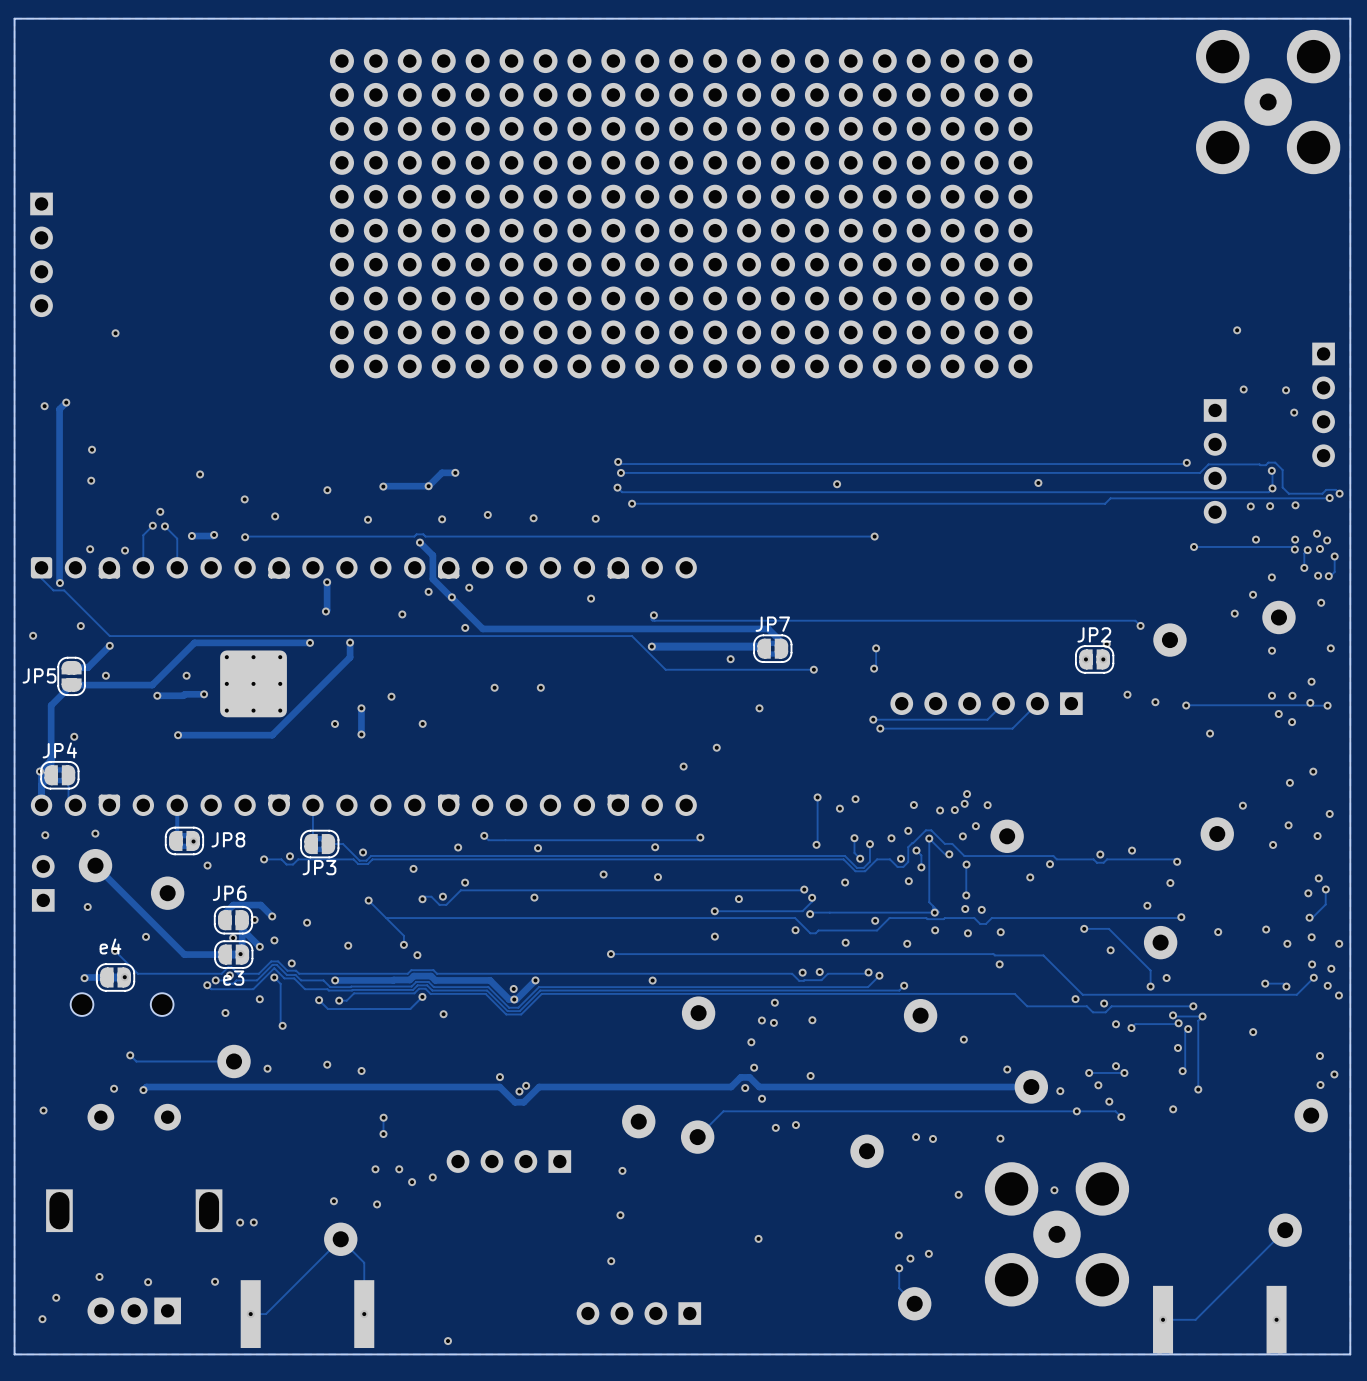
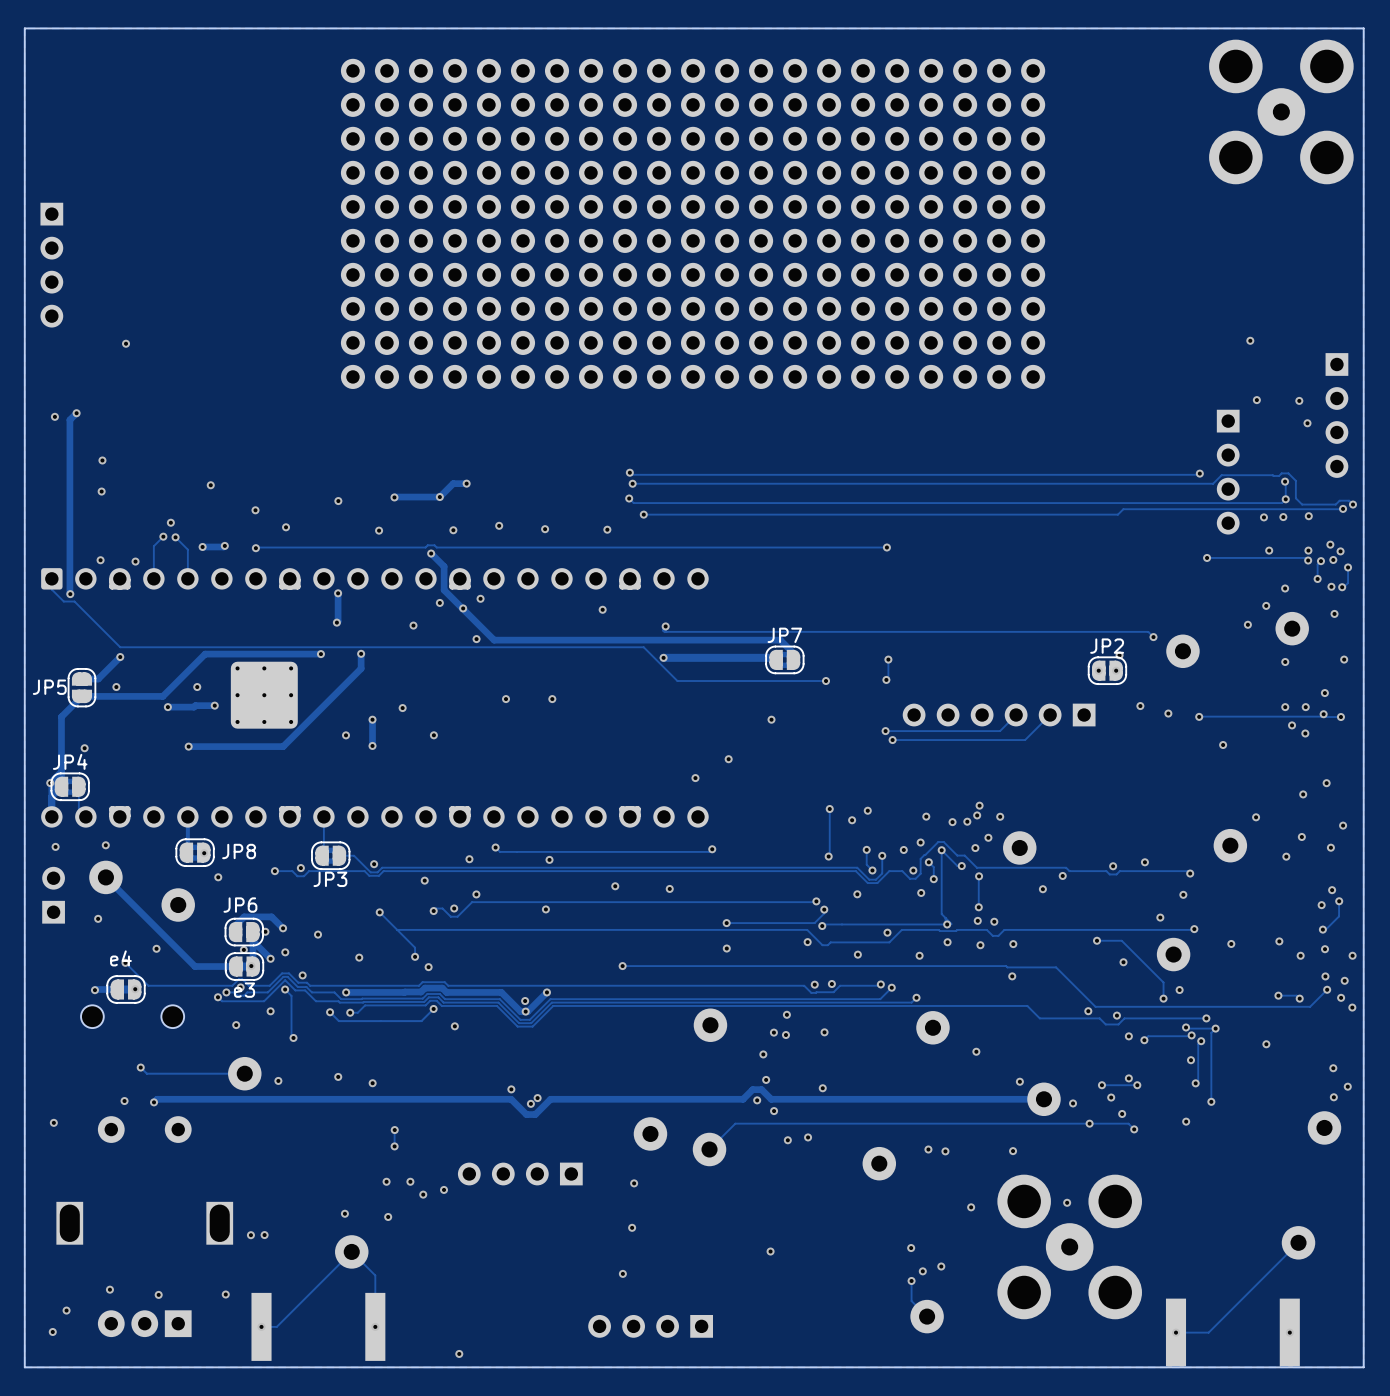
via: (1038, 482) -> none
via: (837, 484) -> none
via: (80, 626) -> none
via: (33, 635) -> none
via: (730, 659) -> none
via: (655, 847) -> none
via: (738, 899) -> none
via: (652, 980) -> none

